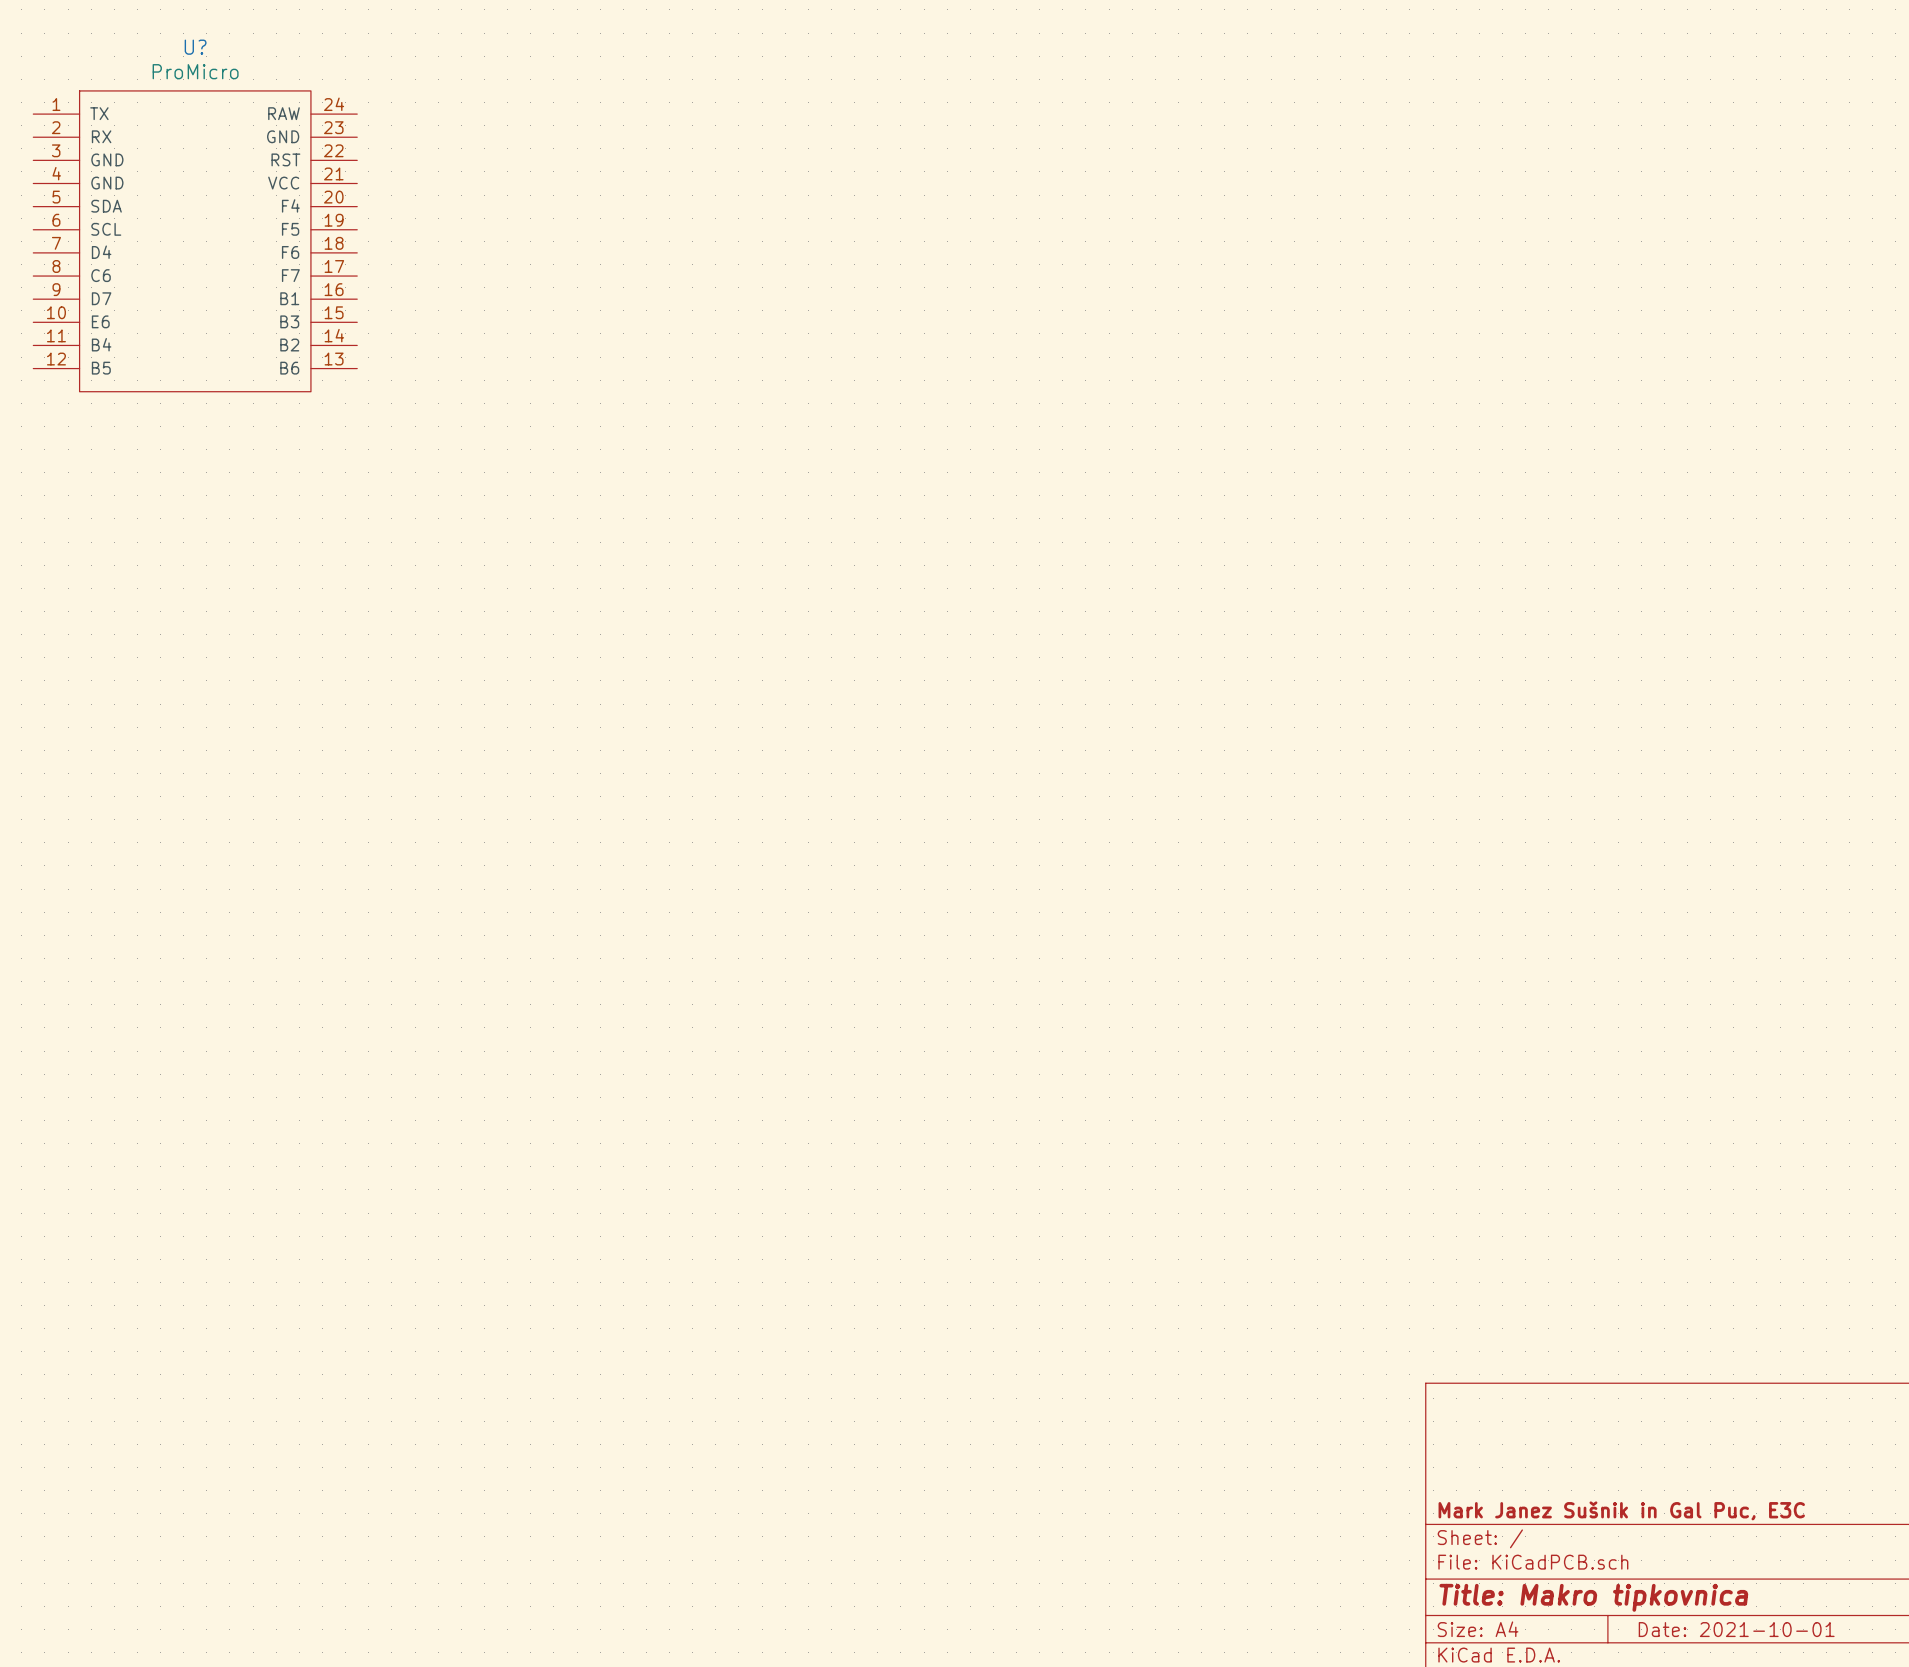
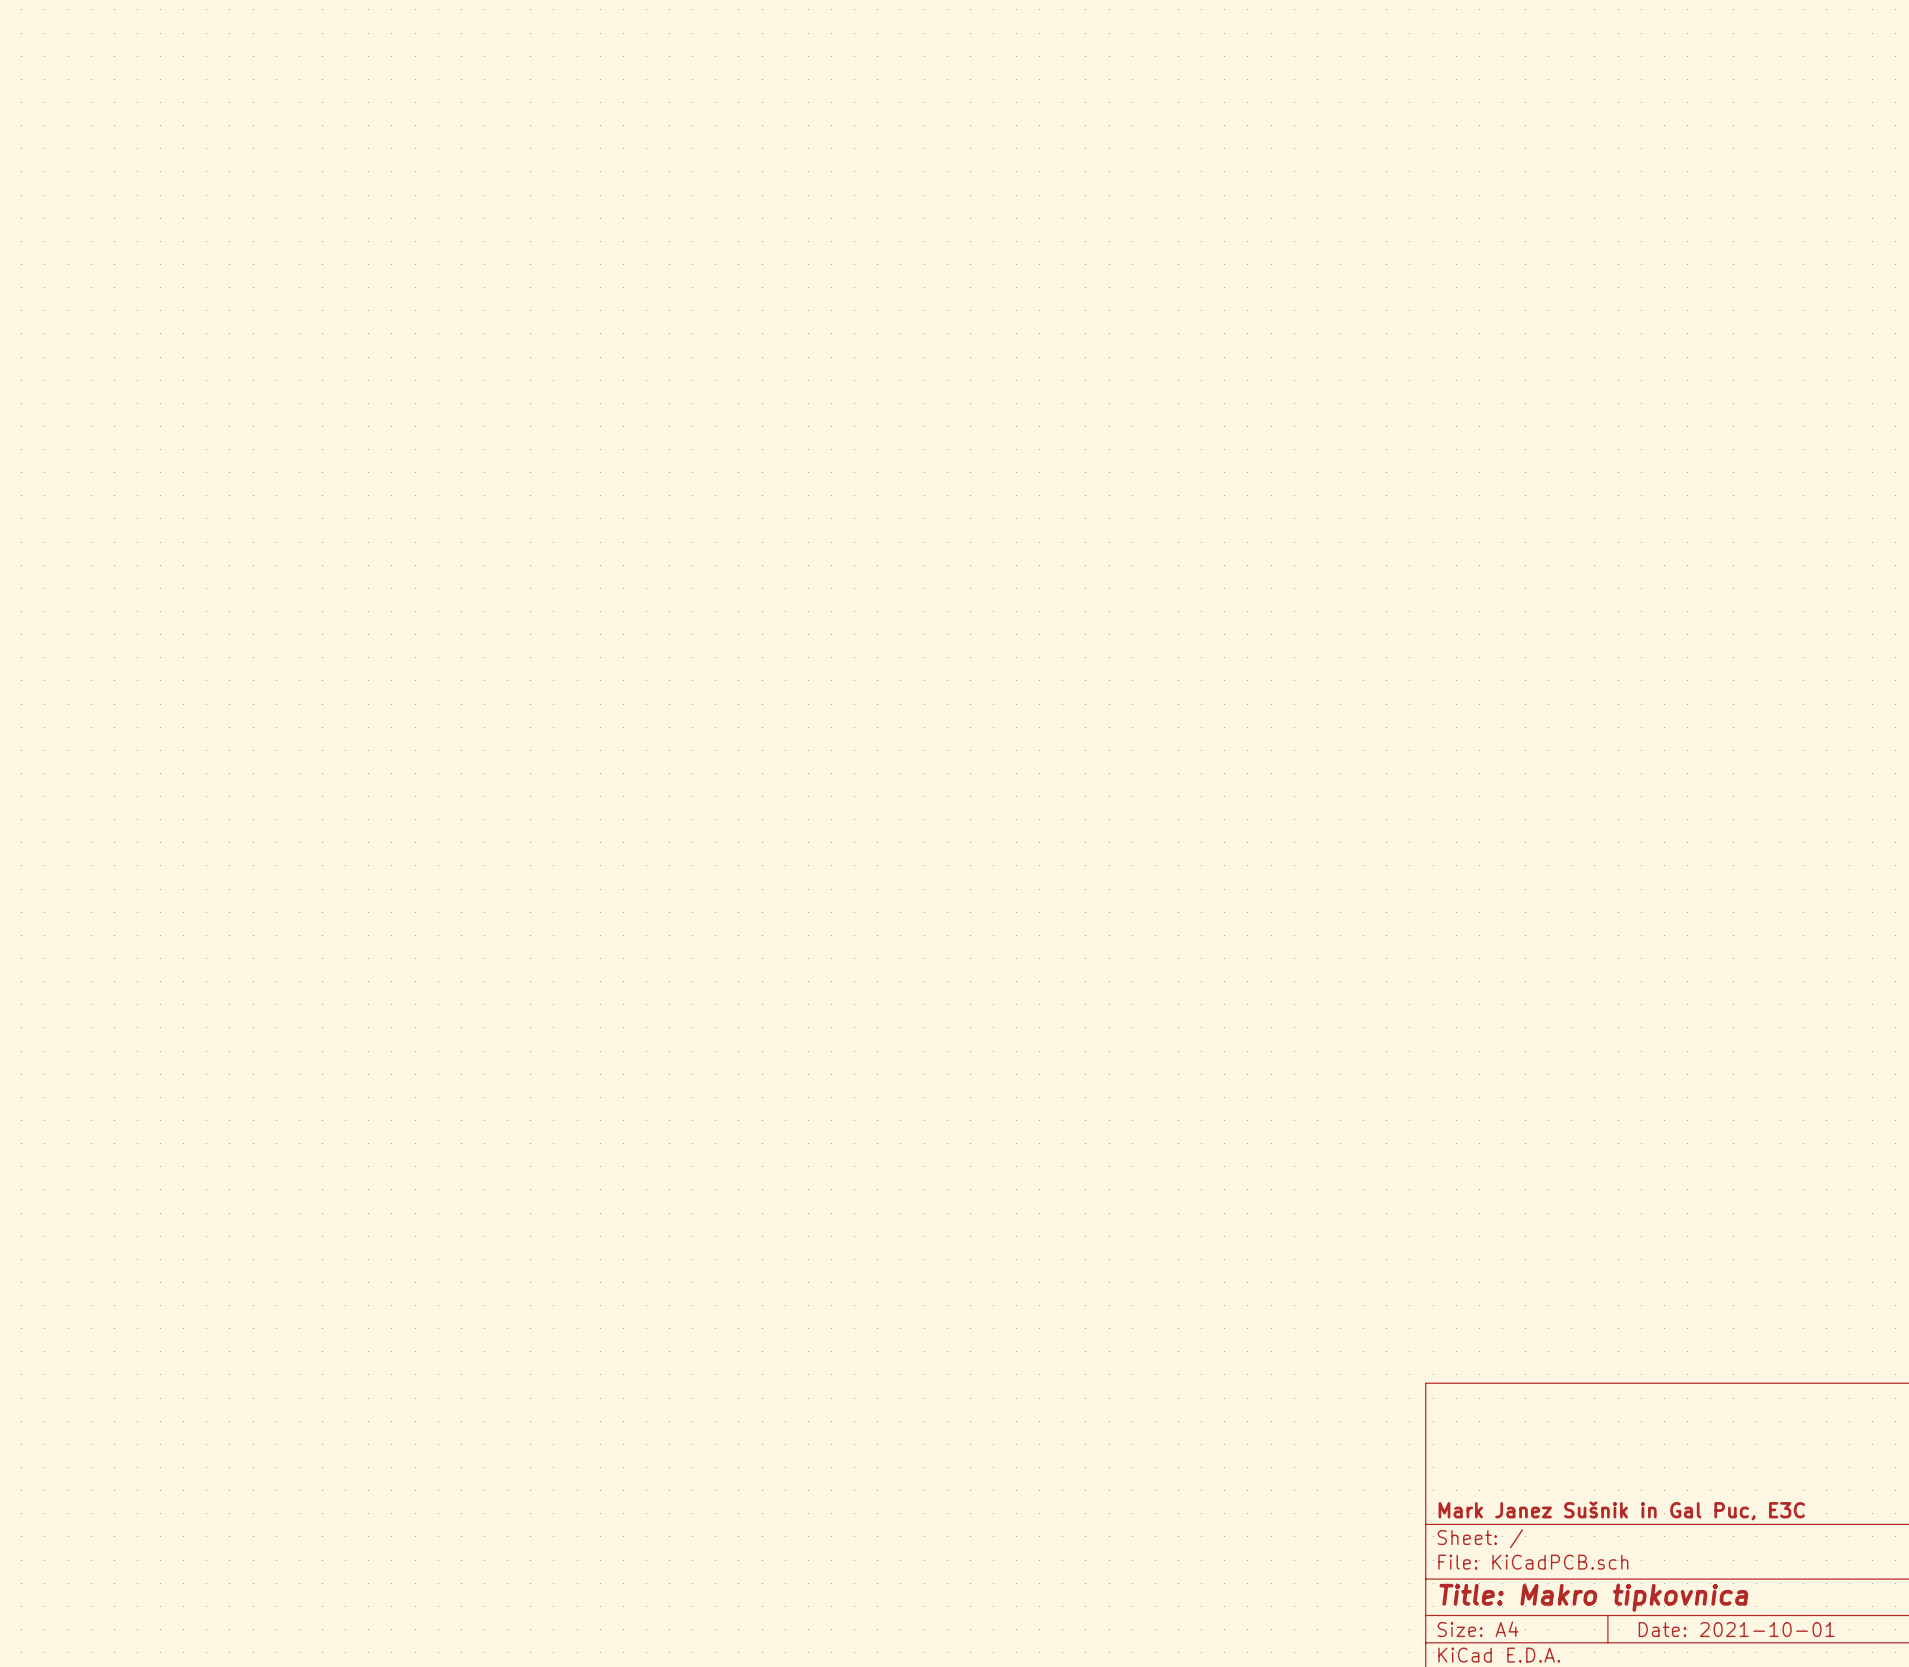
U?: ProMicro (195, 241) -> none

